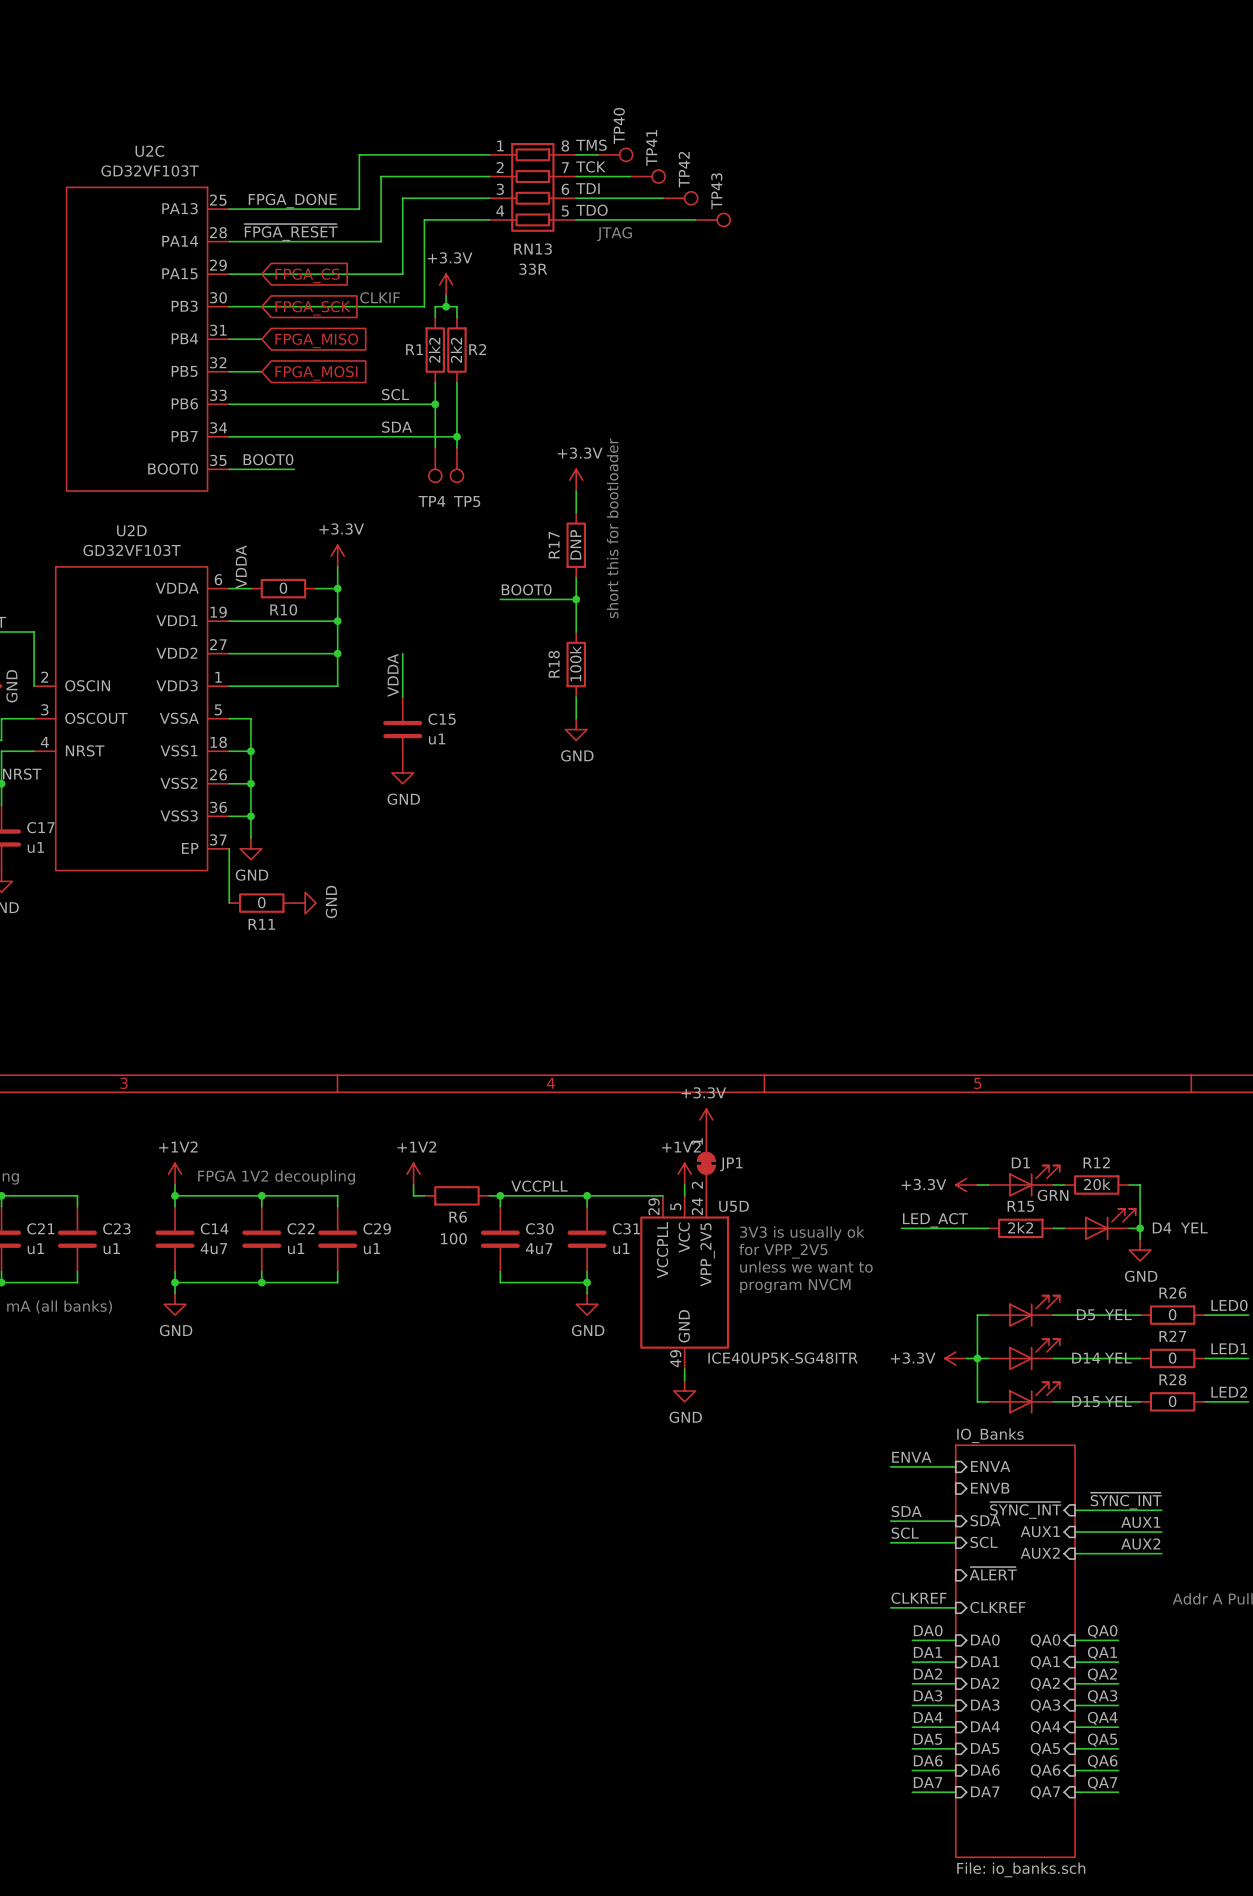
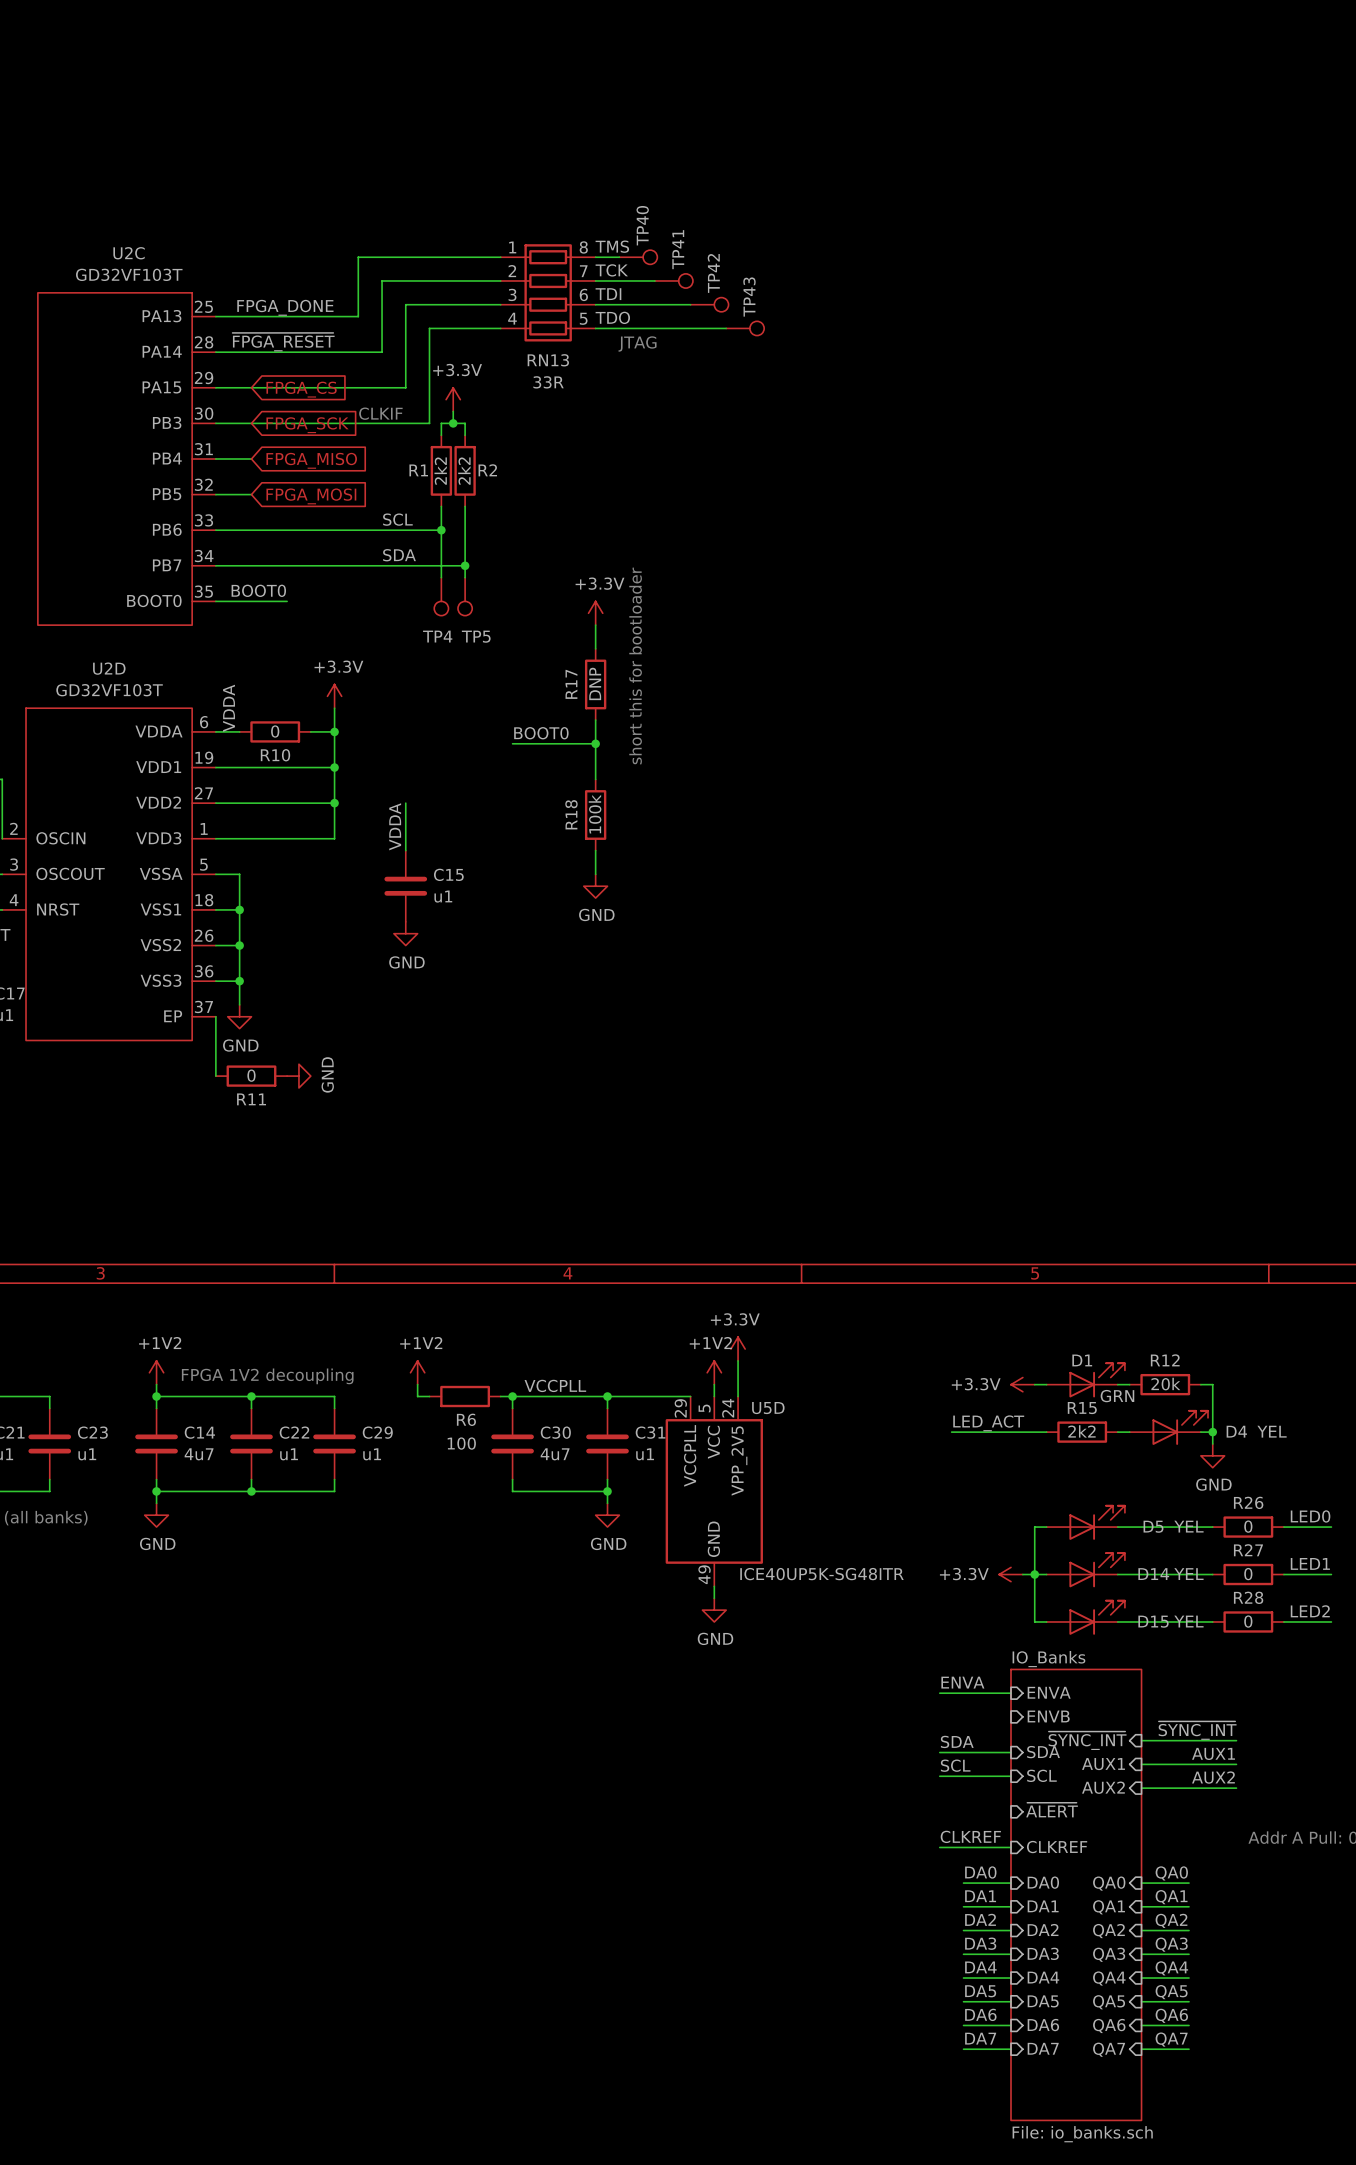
power symbol position: +3.3V (706, 1119) -> +3.3V (738, 1349)
JP1: (706, 1163) -> none
text: 3V3 is usually ok (802, 1233) -> none
text: for VPP_2V5 (783, 1251) -> none
text: unless we want to (806, 1266) -> none
text: program NVCM (795, 1286) -> none

